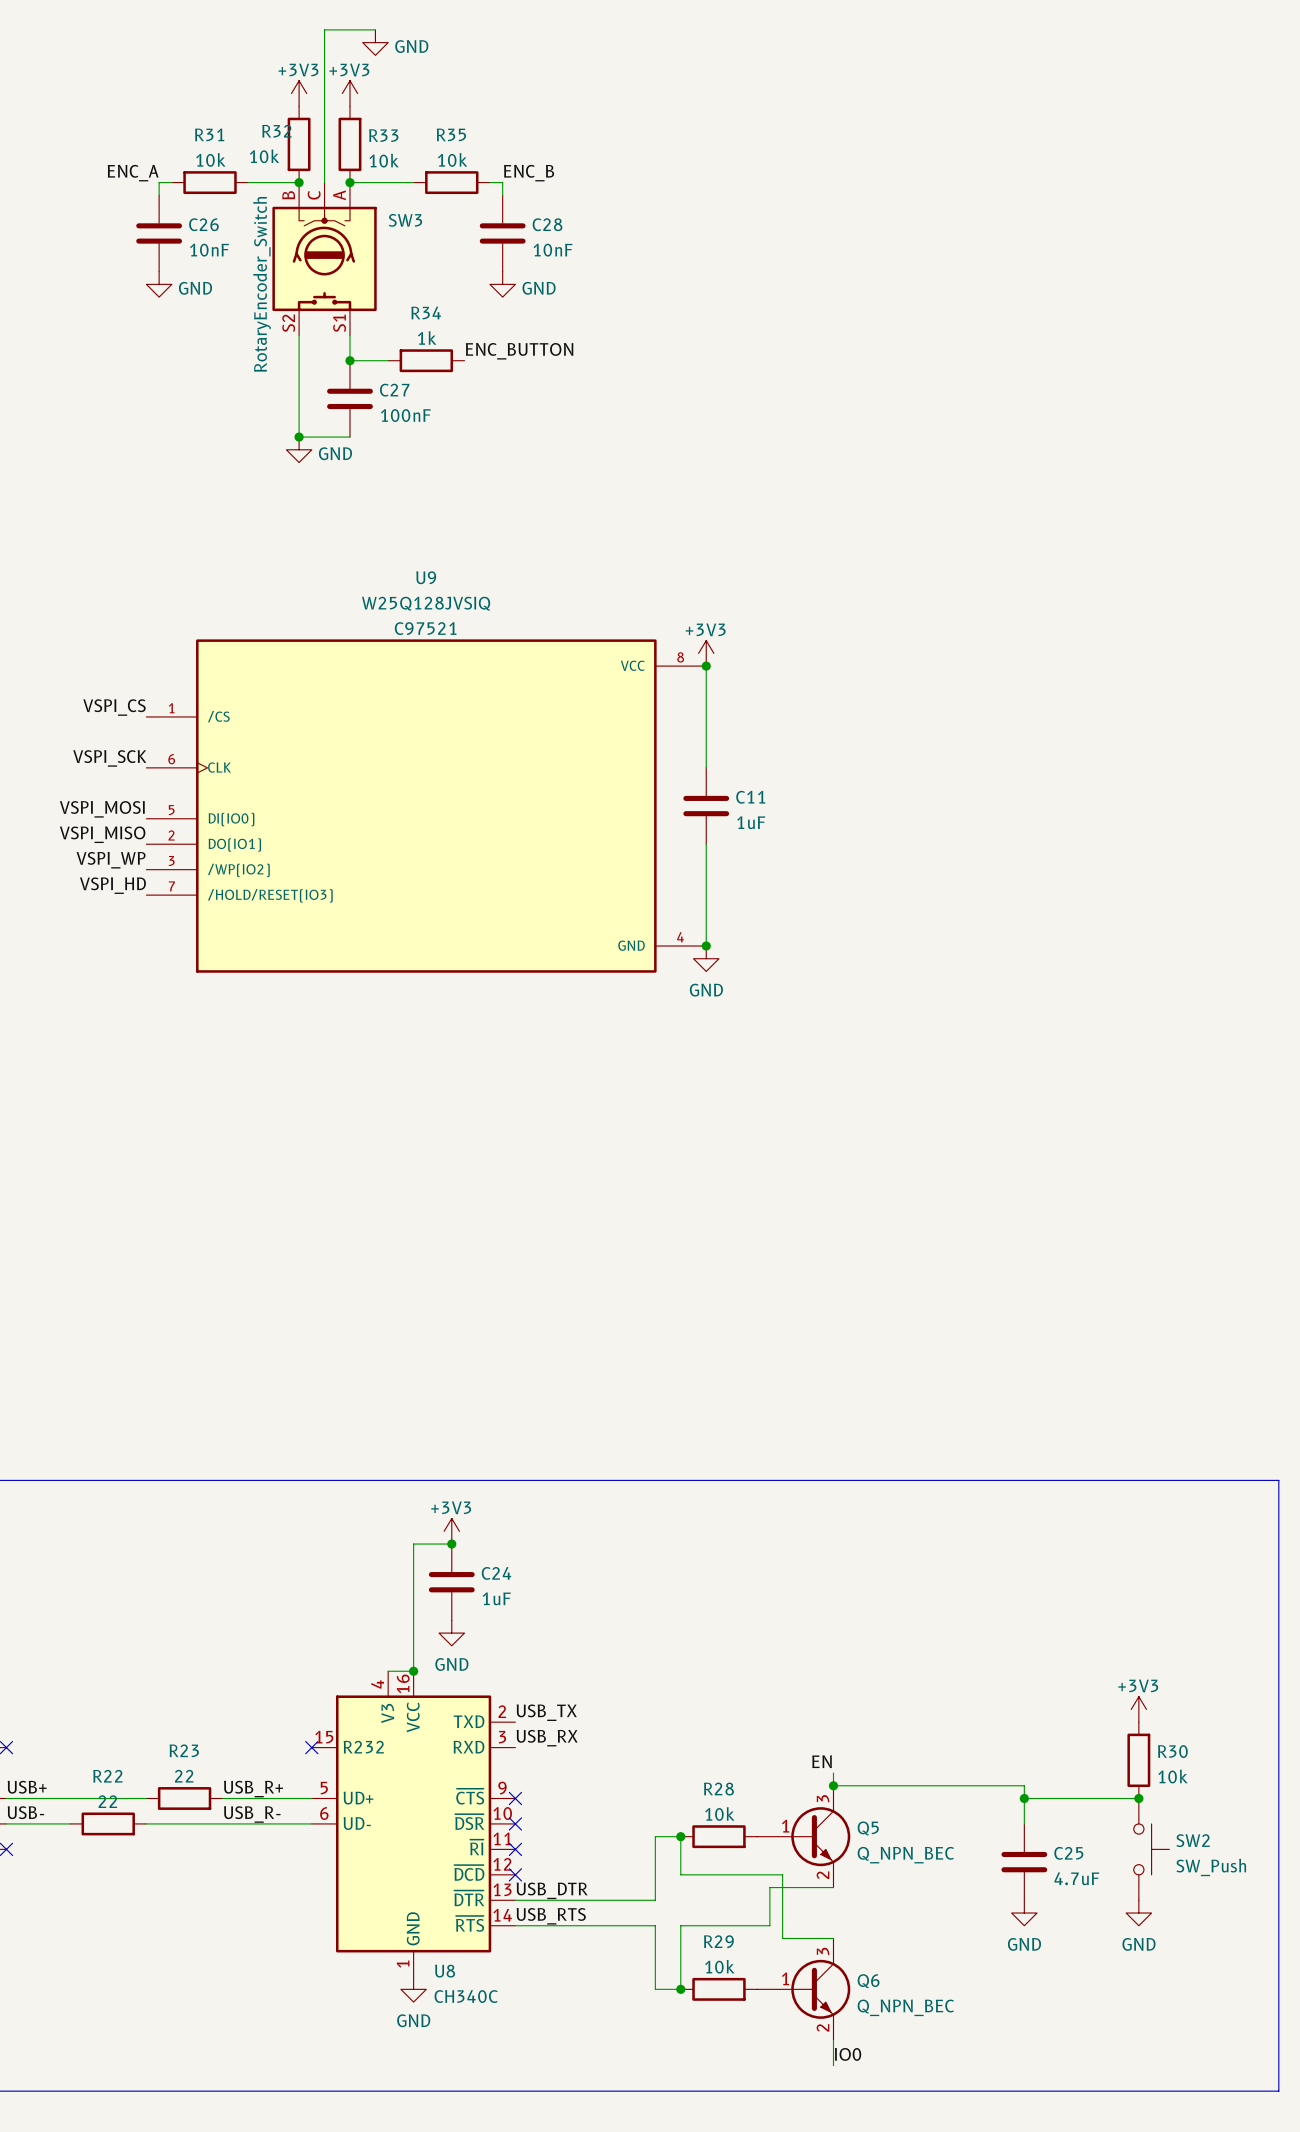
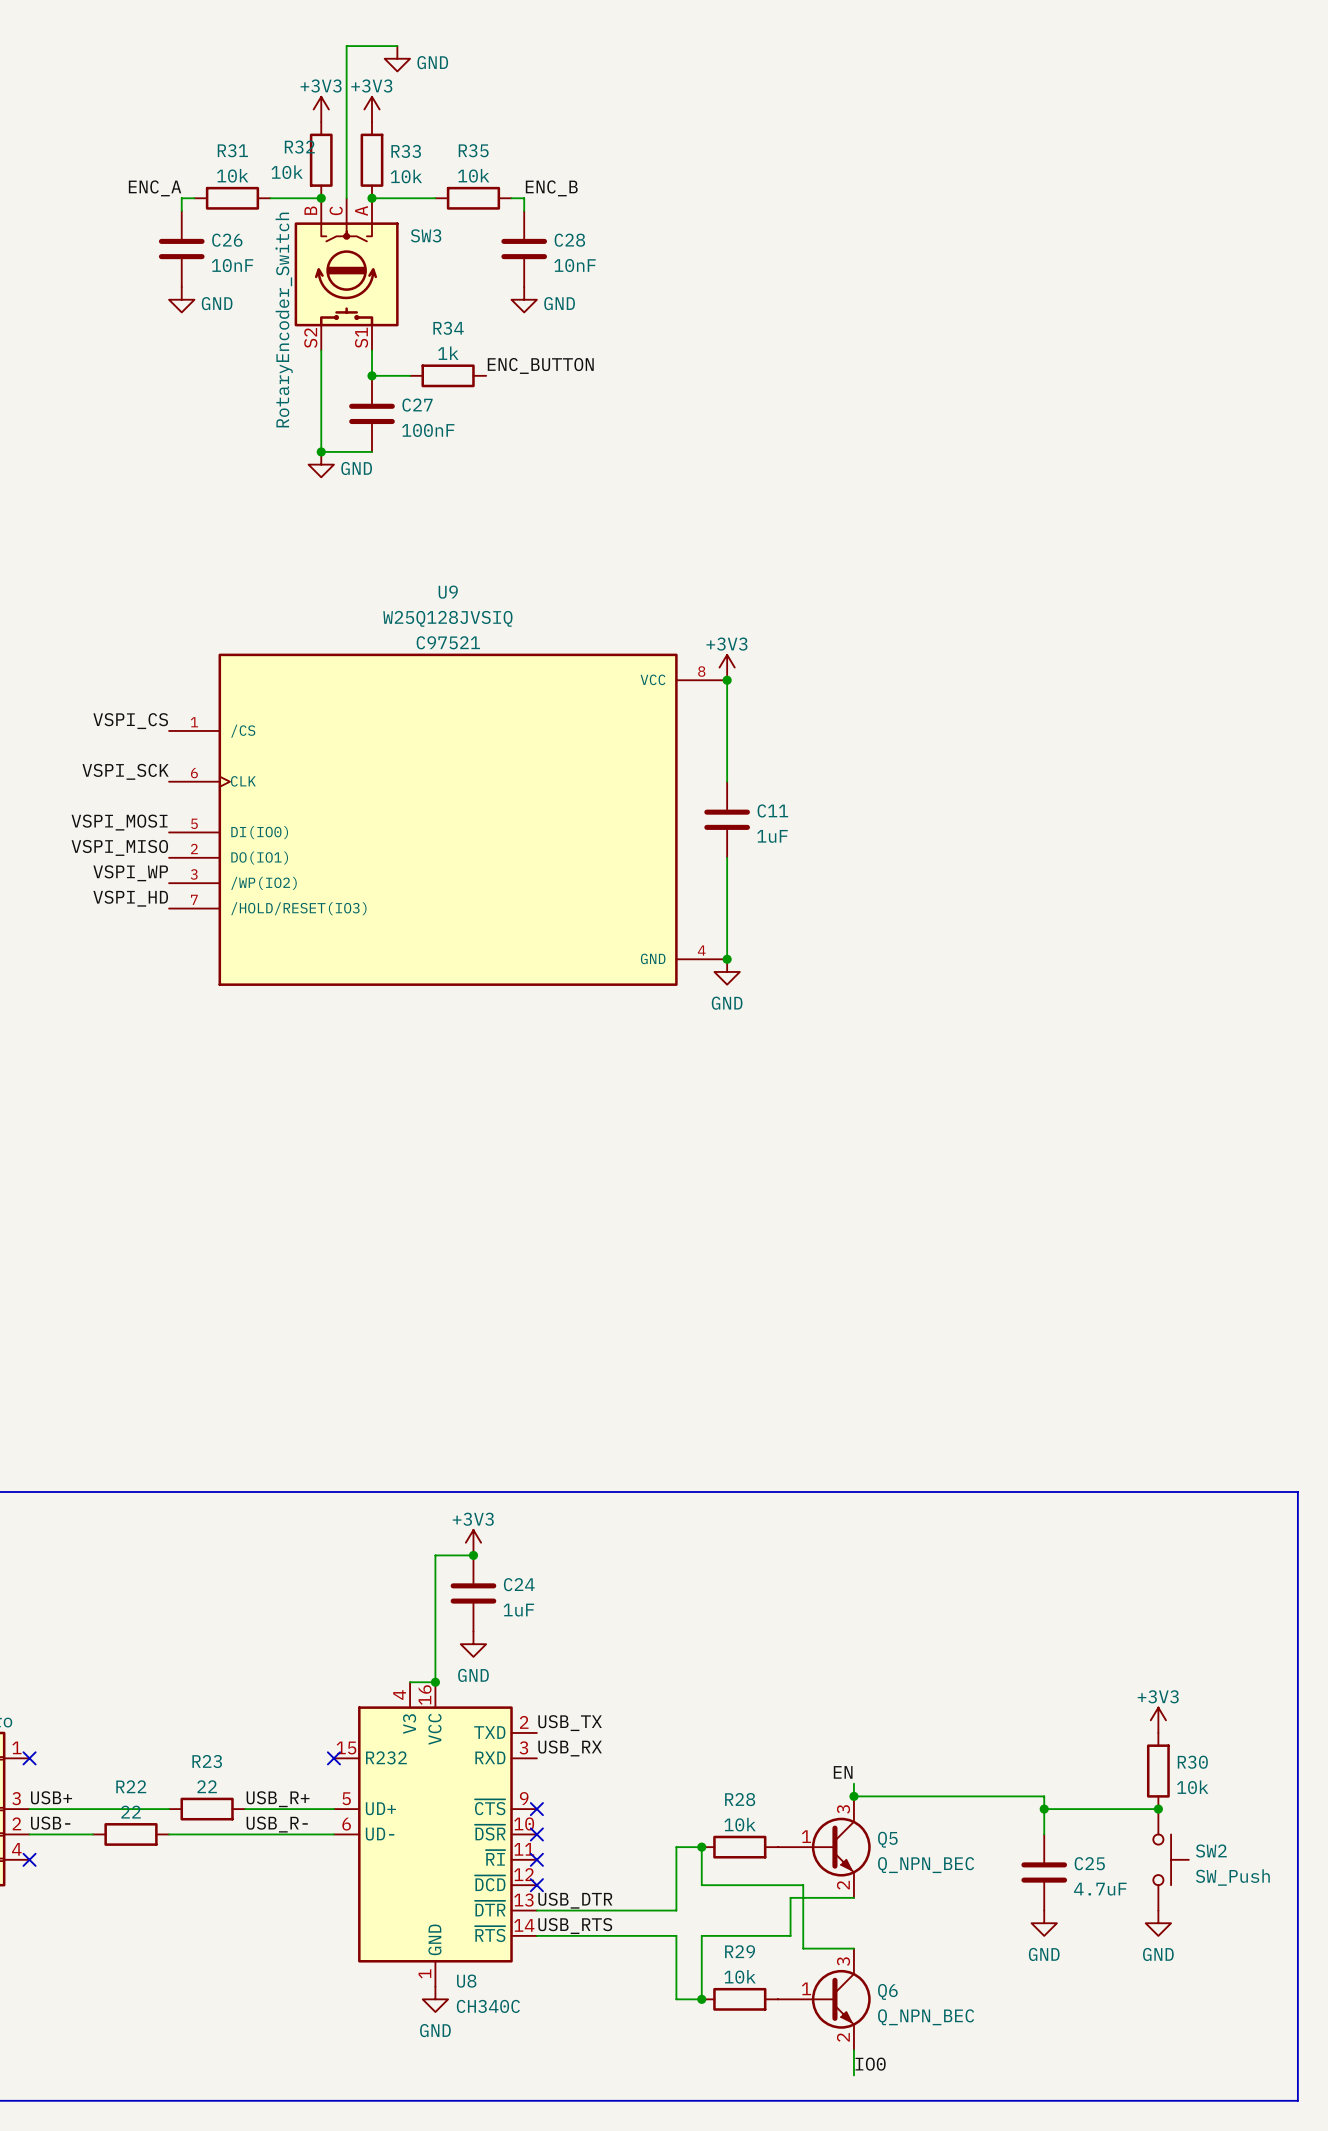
SW3 symbol: [272, 182, 377, 336] -> [294, 198, 399, 351]

